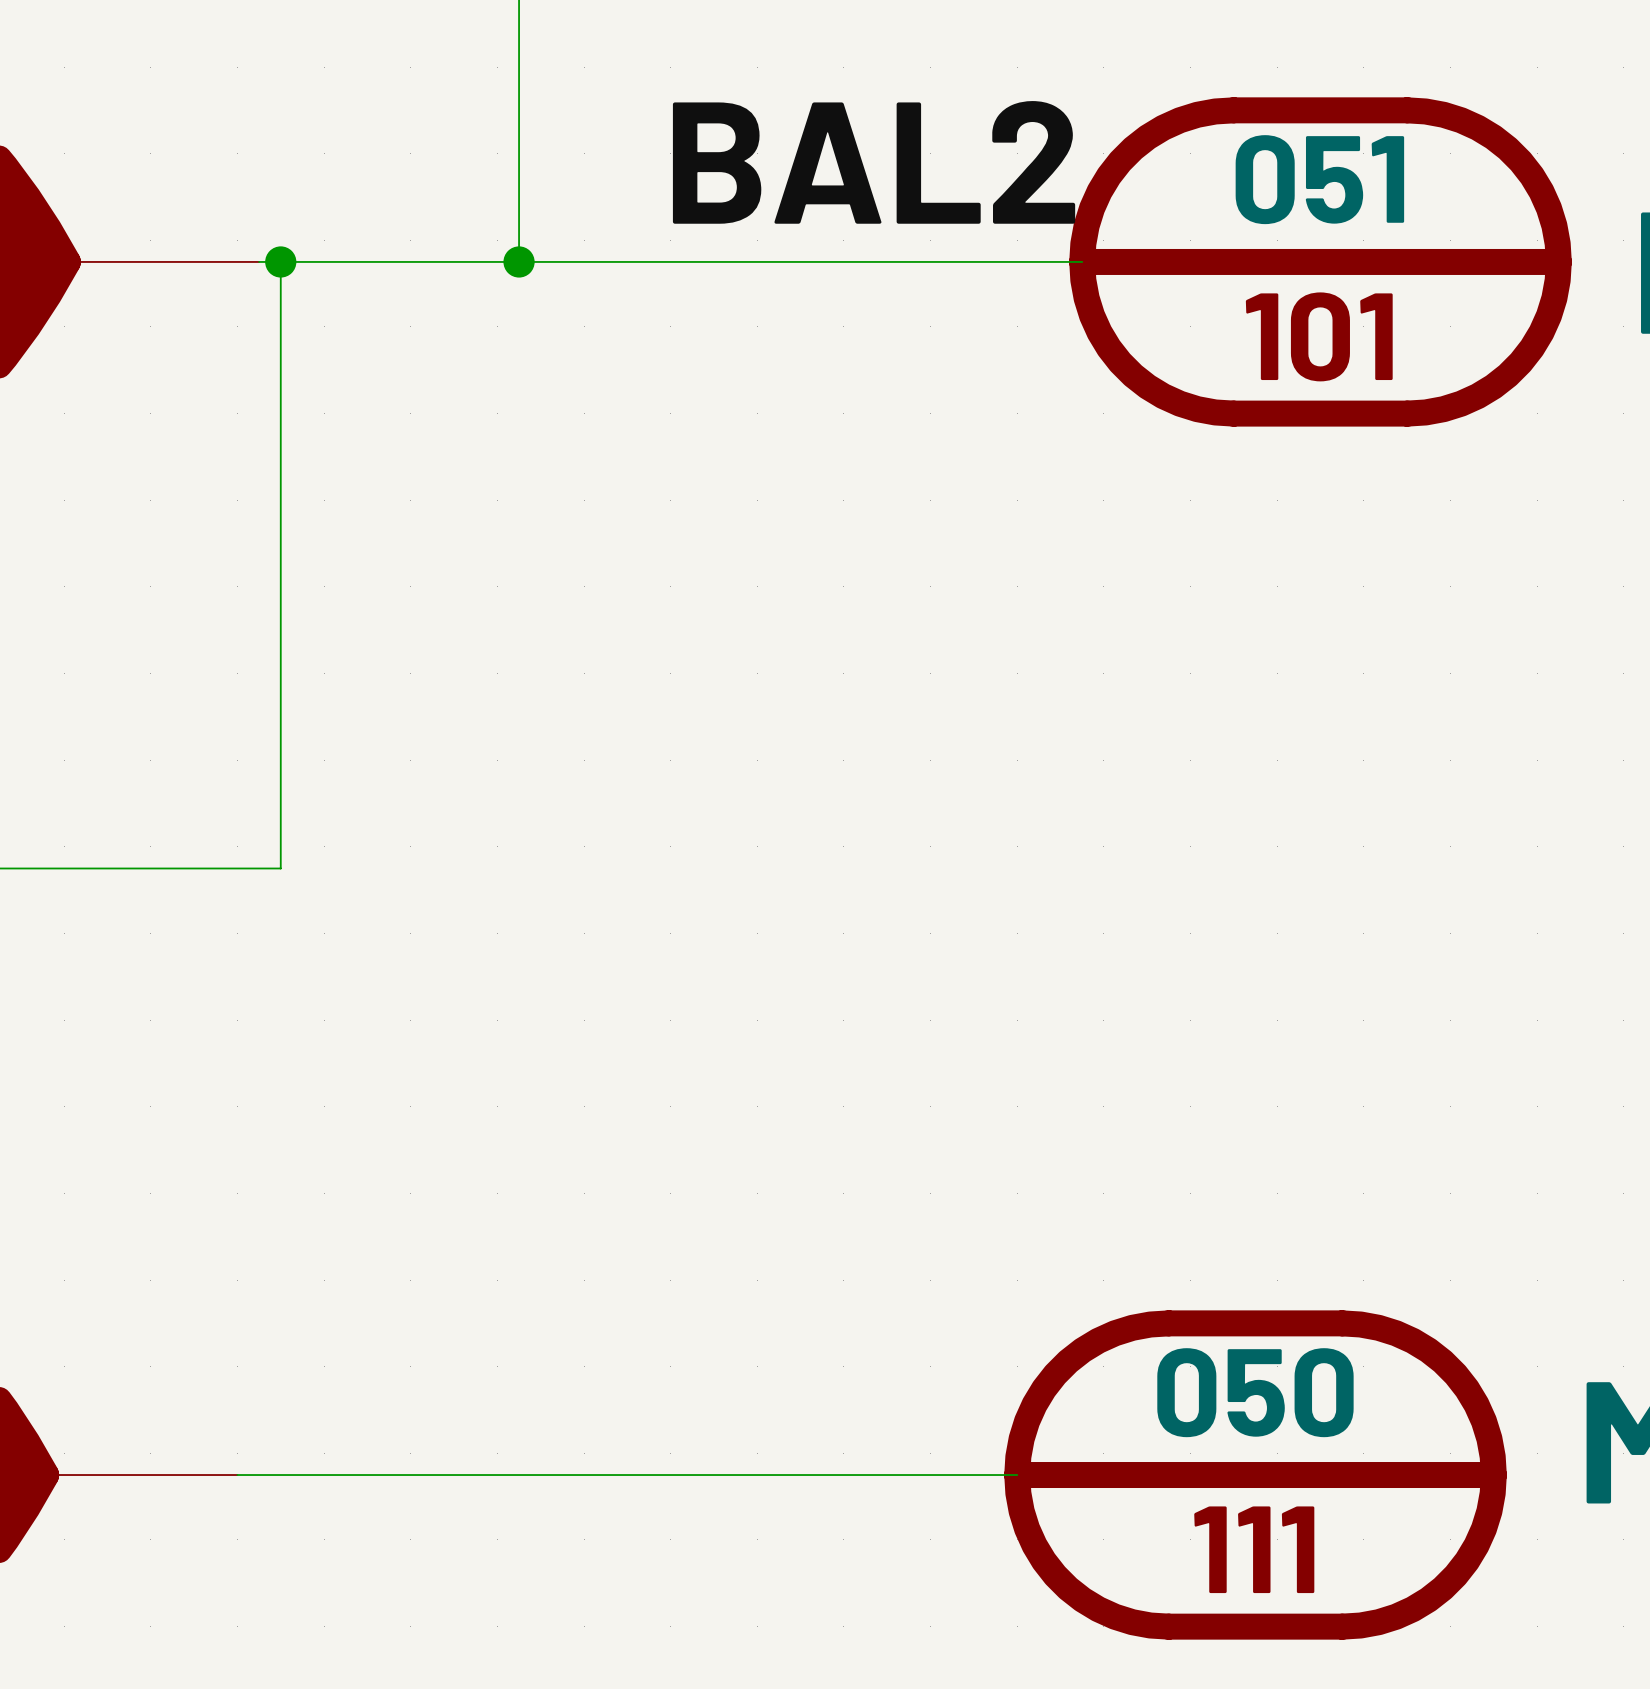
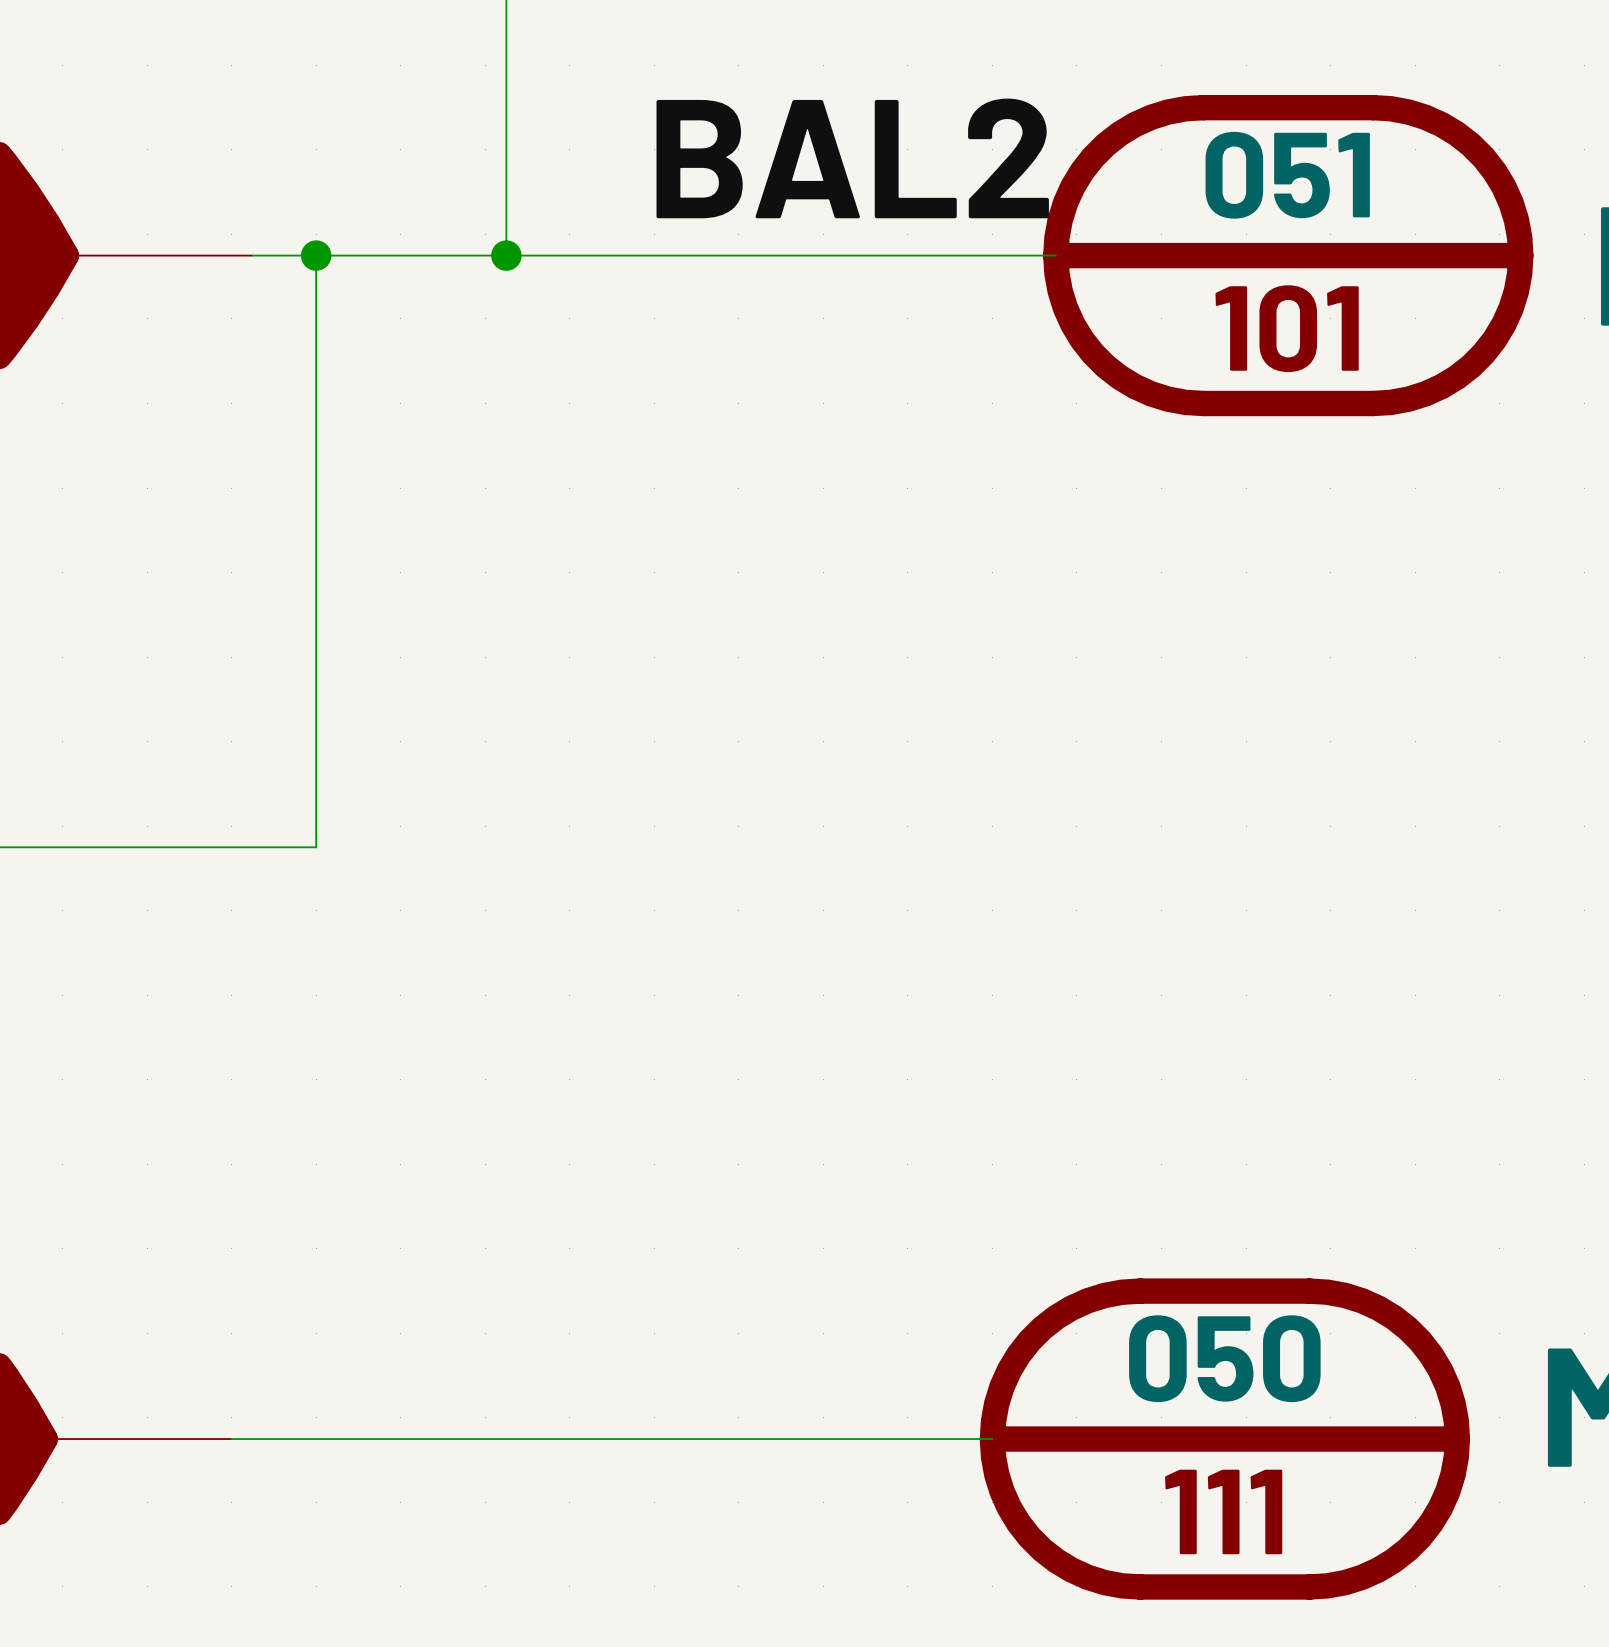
wire: (280, 261) (280, 868) -> (316, 255) (316, 847) (273, 847)
junction position: (280, 261) -> (316, 255)

